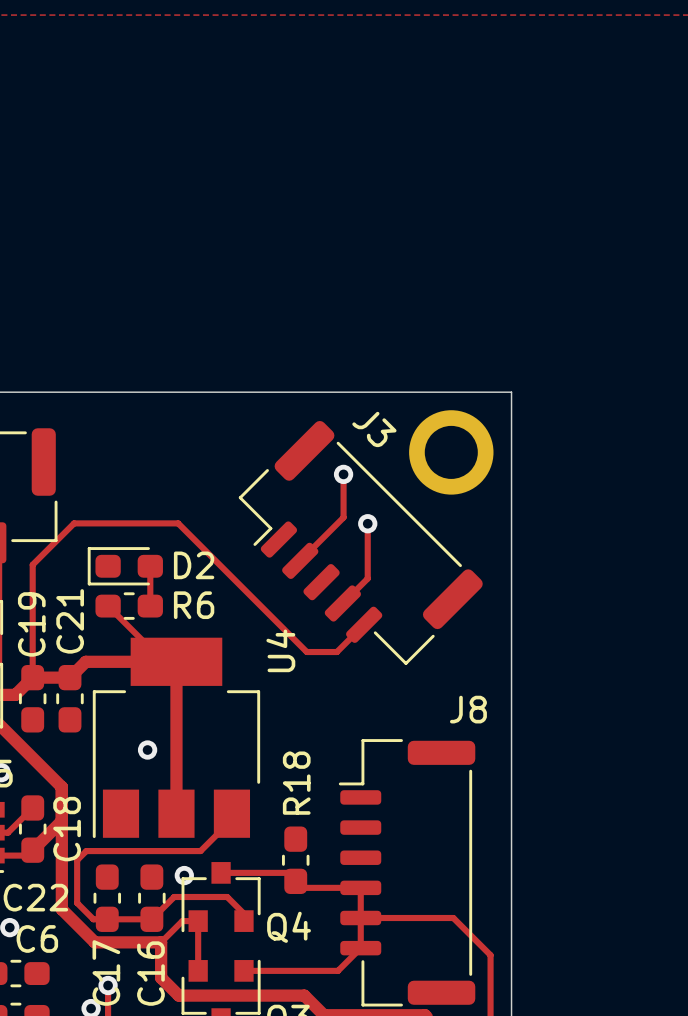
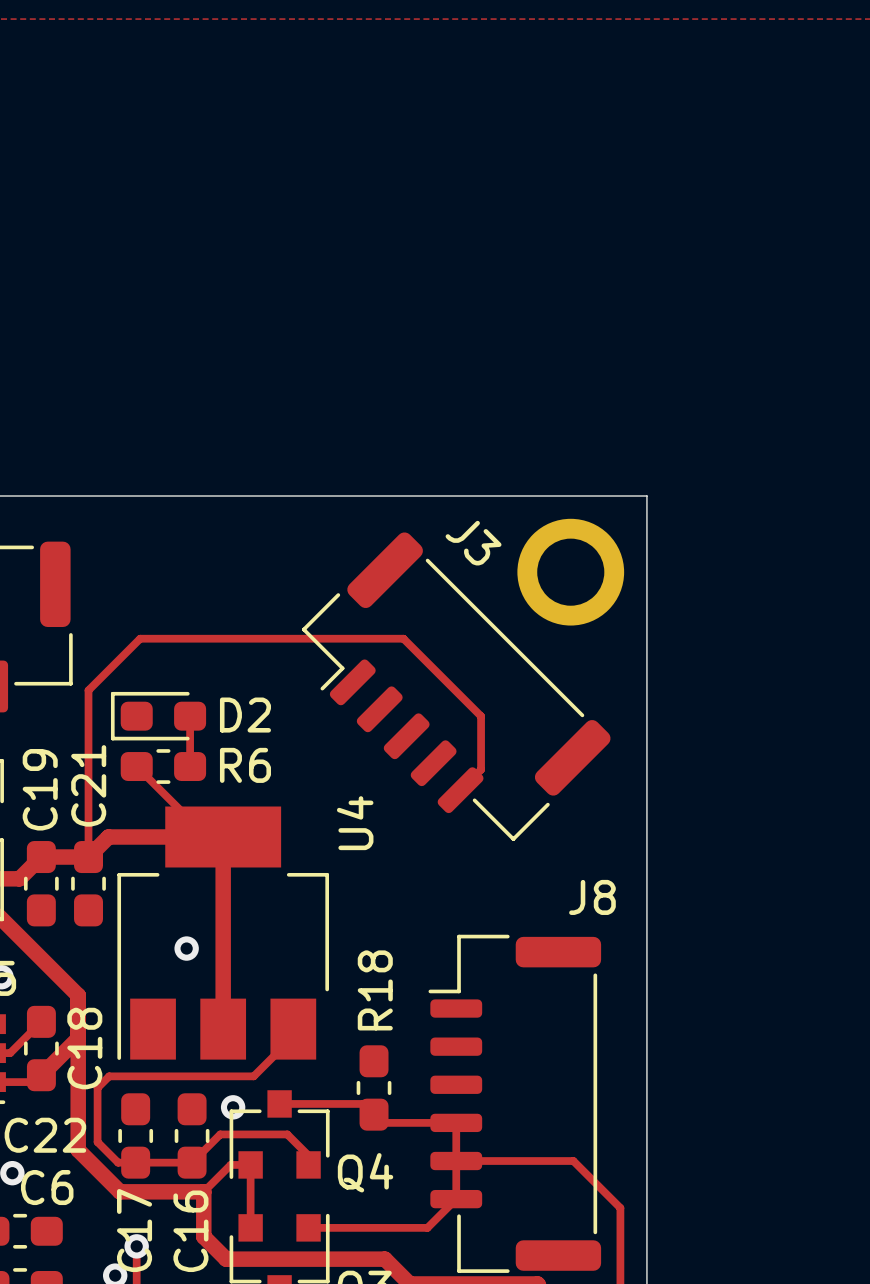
track: (343, 474) (343, 517) (300, 560) -> none
via: (343, 474) -> none
track: (367, 523) (367, 578) (342, 603) -> none
via: (367, 523) -> none
track: (364, 624) (336, 652) (306, 652) (178, 523) (74, 523) (32, 564) (32, 677) -> (460, 790) (481, 769) (481, 716) (403, 638) (140, 638) (88, 690) (88, 857)

